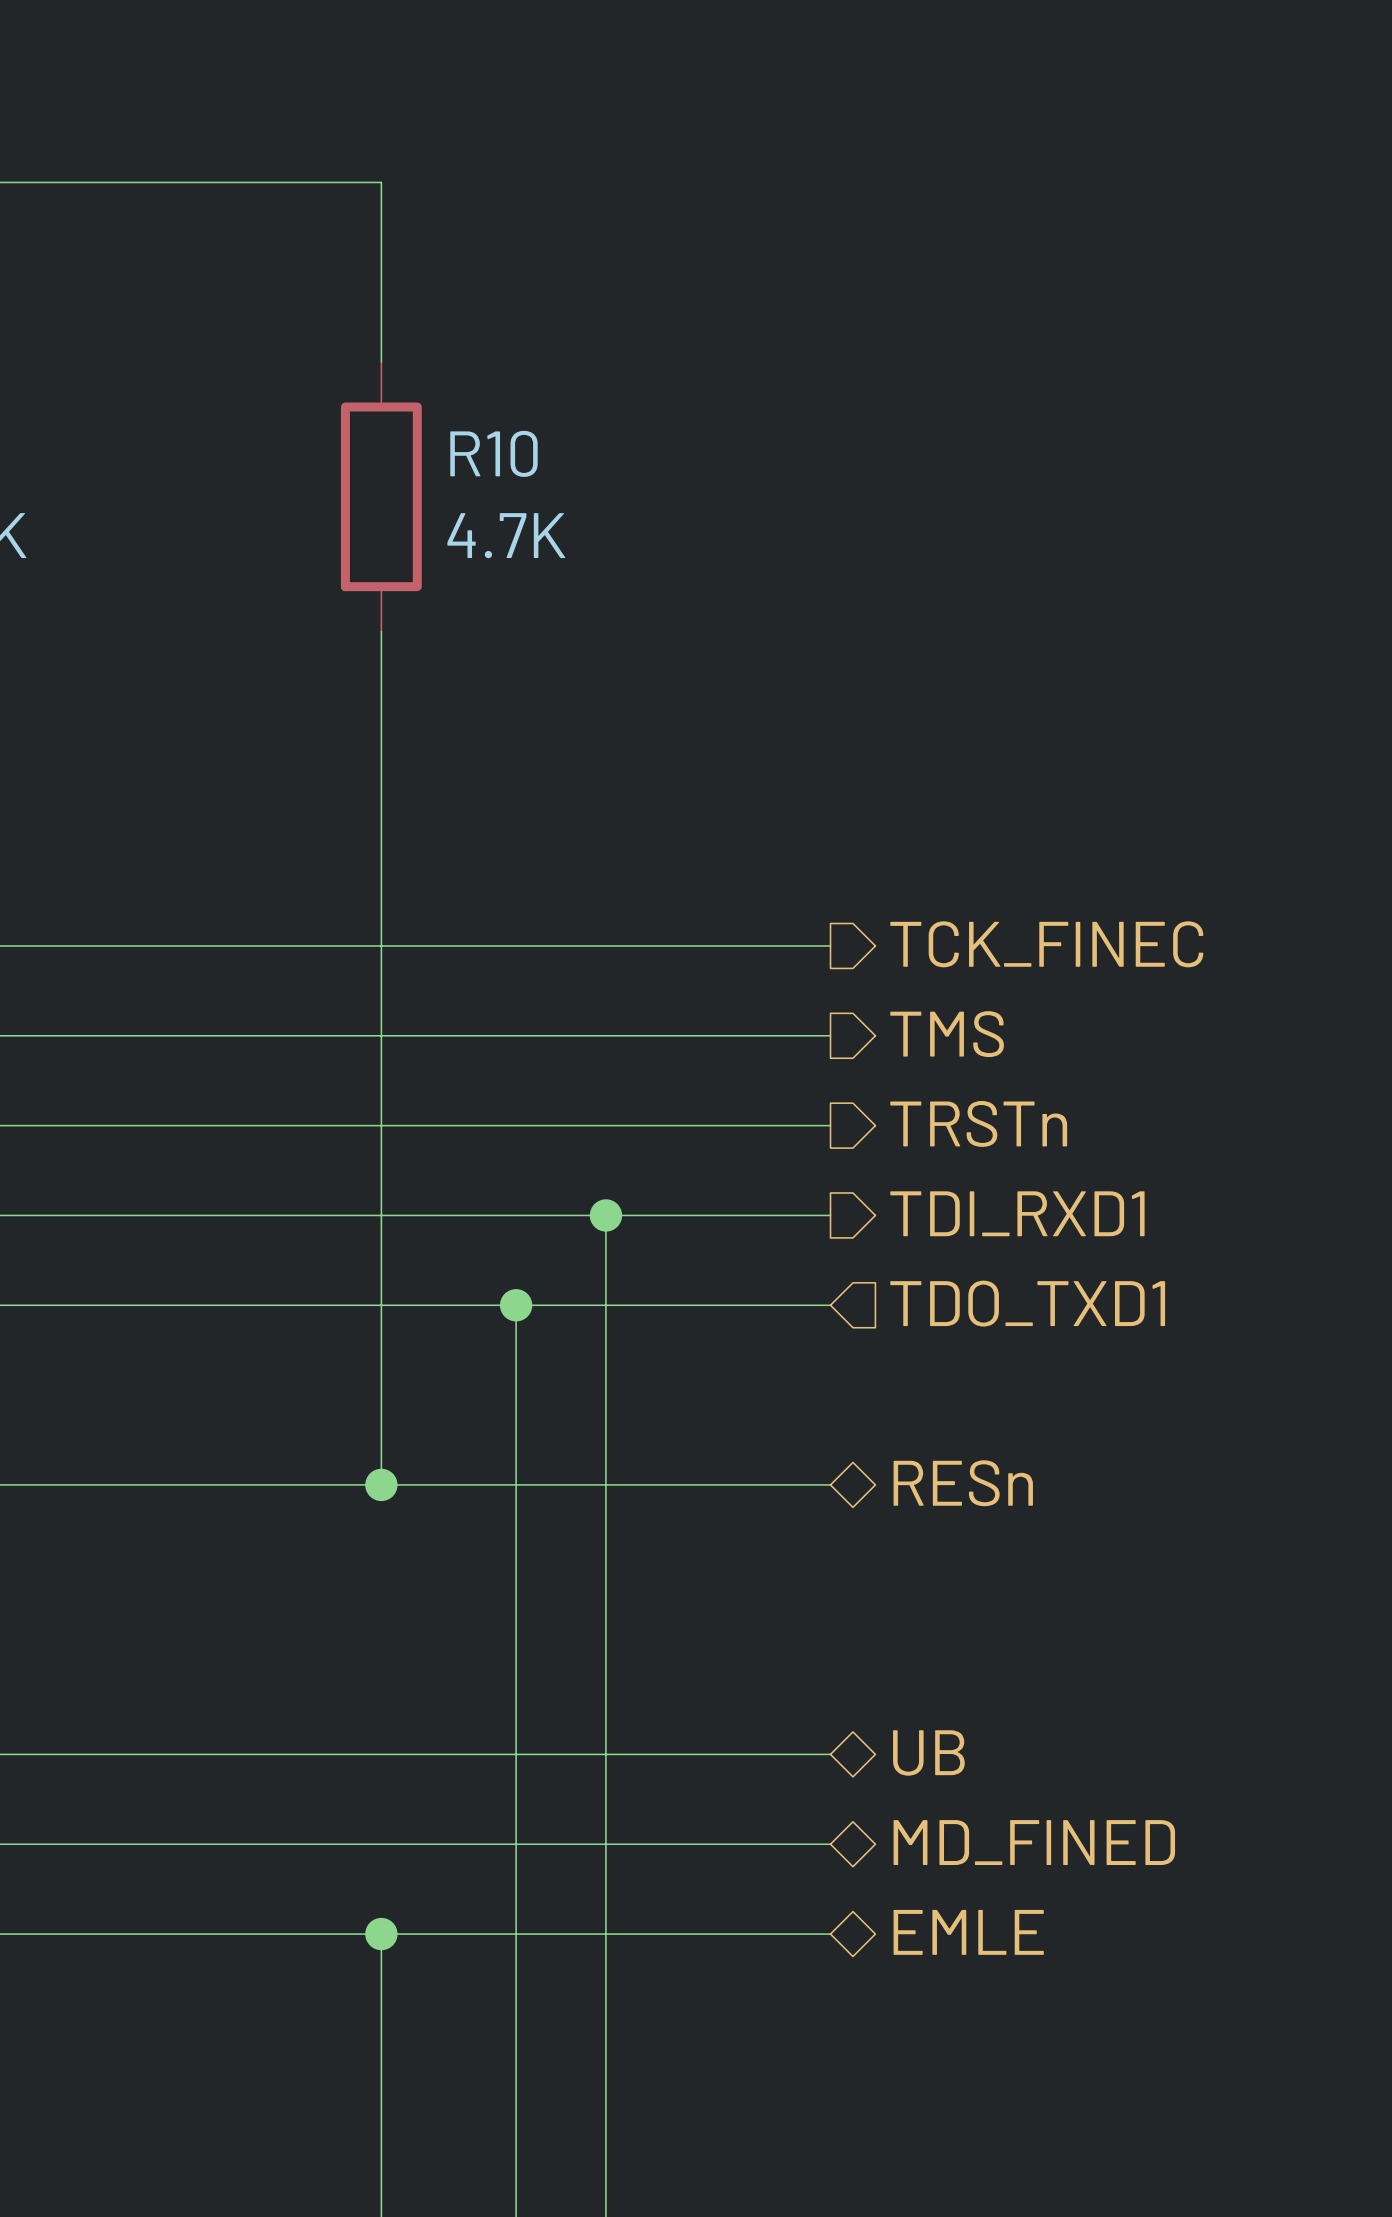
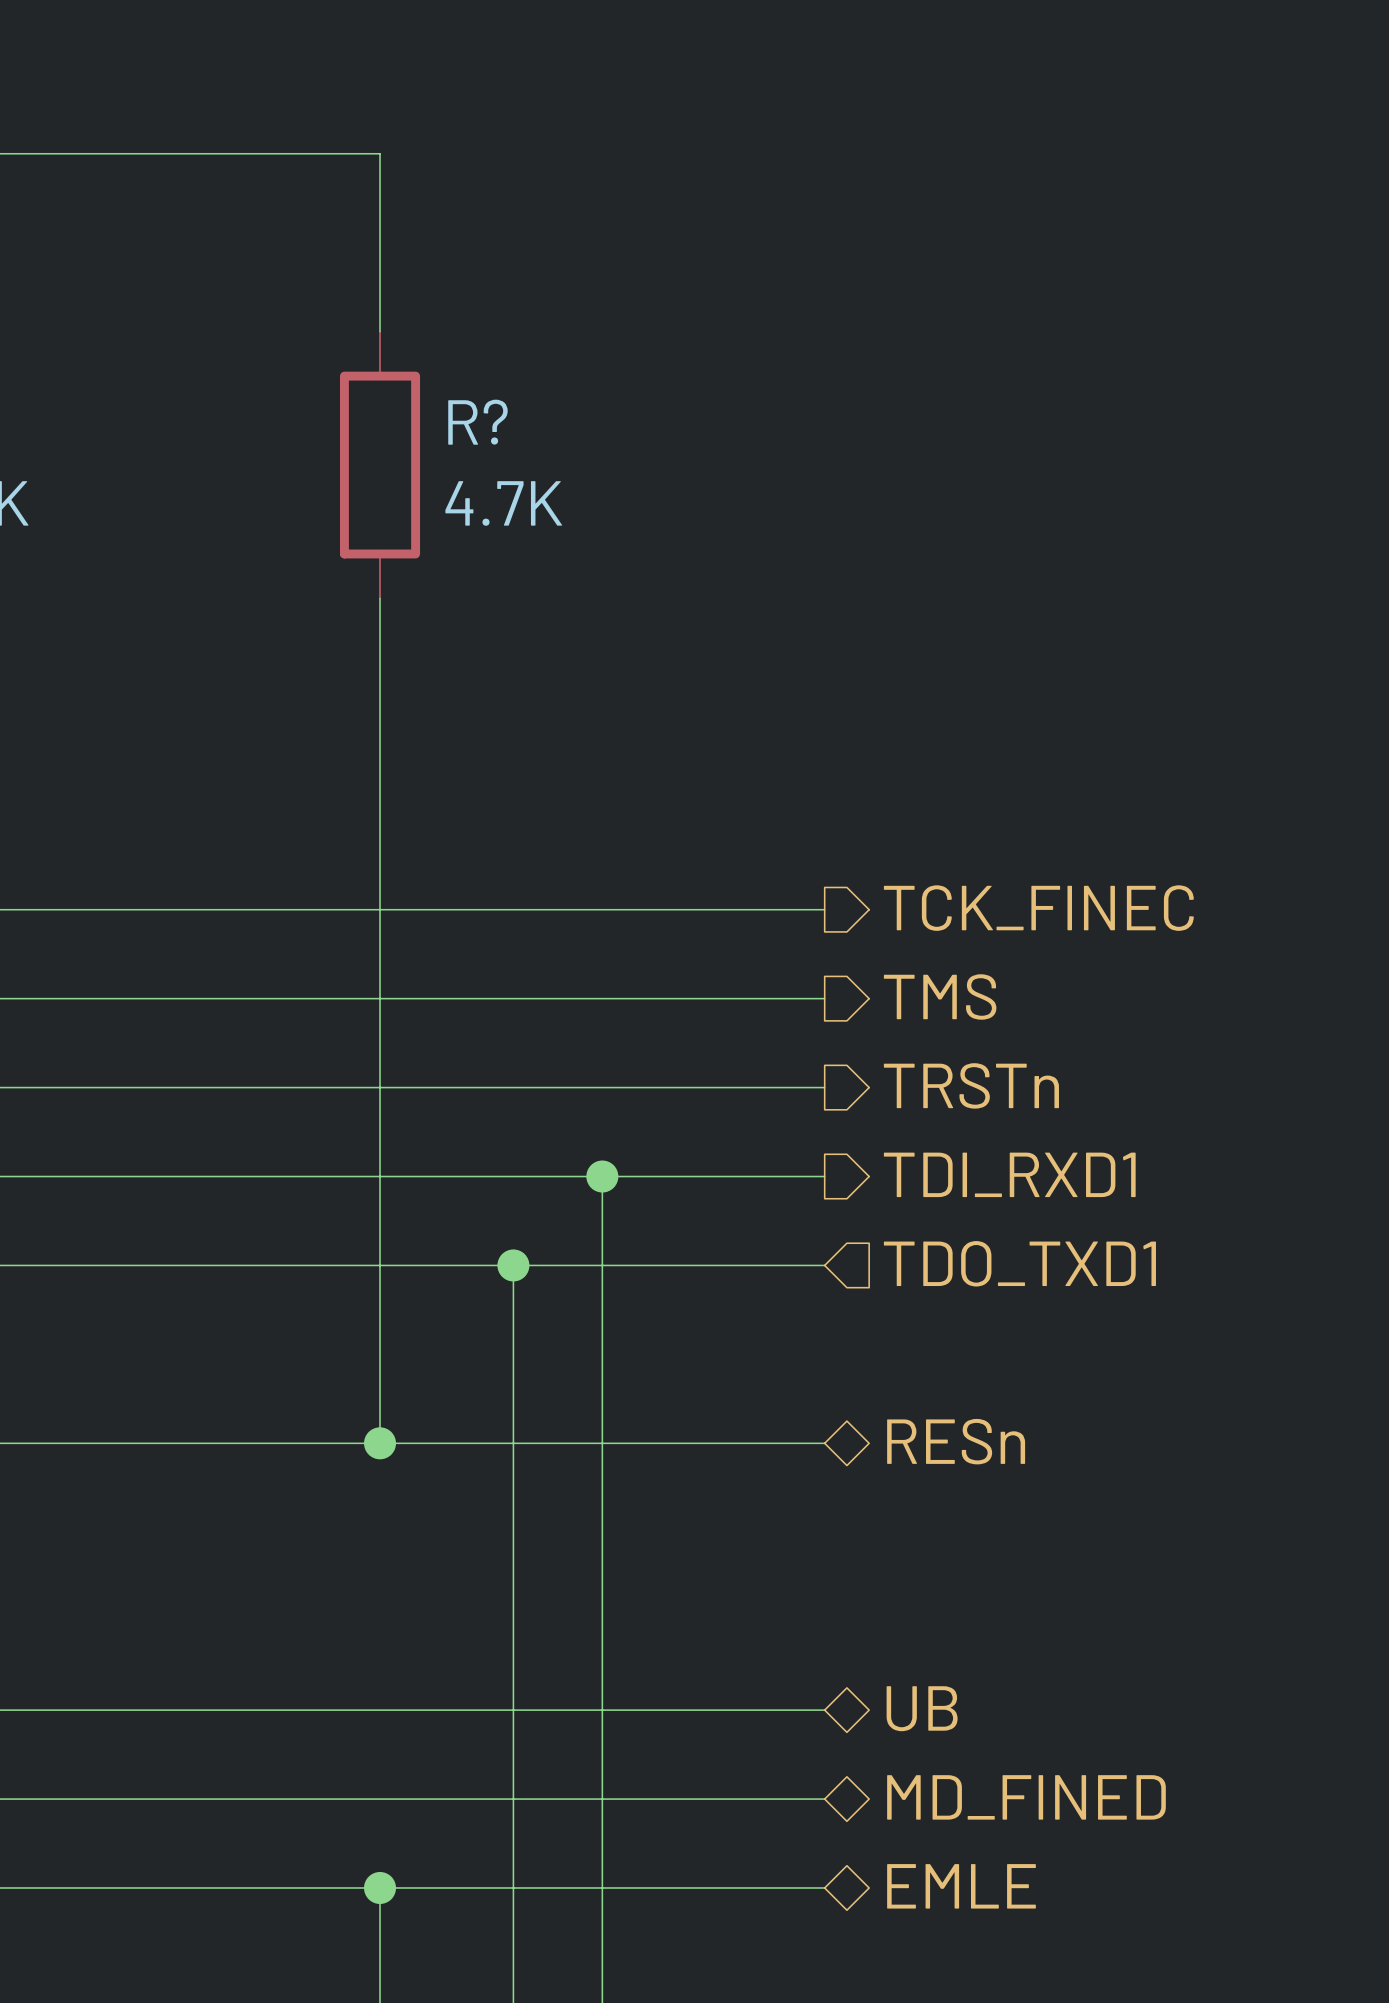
R10 name: R10 (493, 453) -> R? (477, 422)

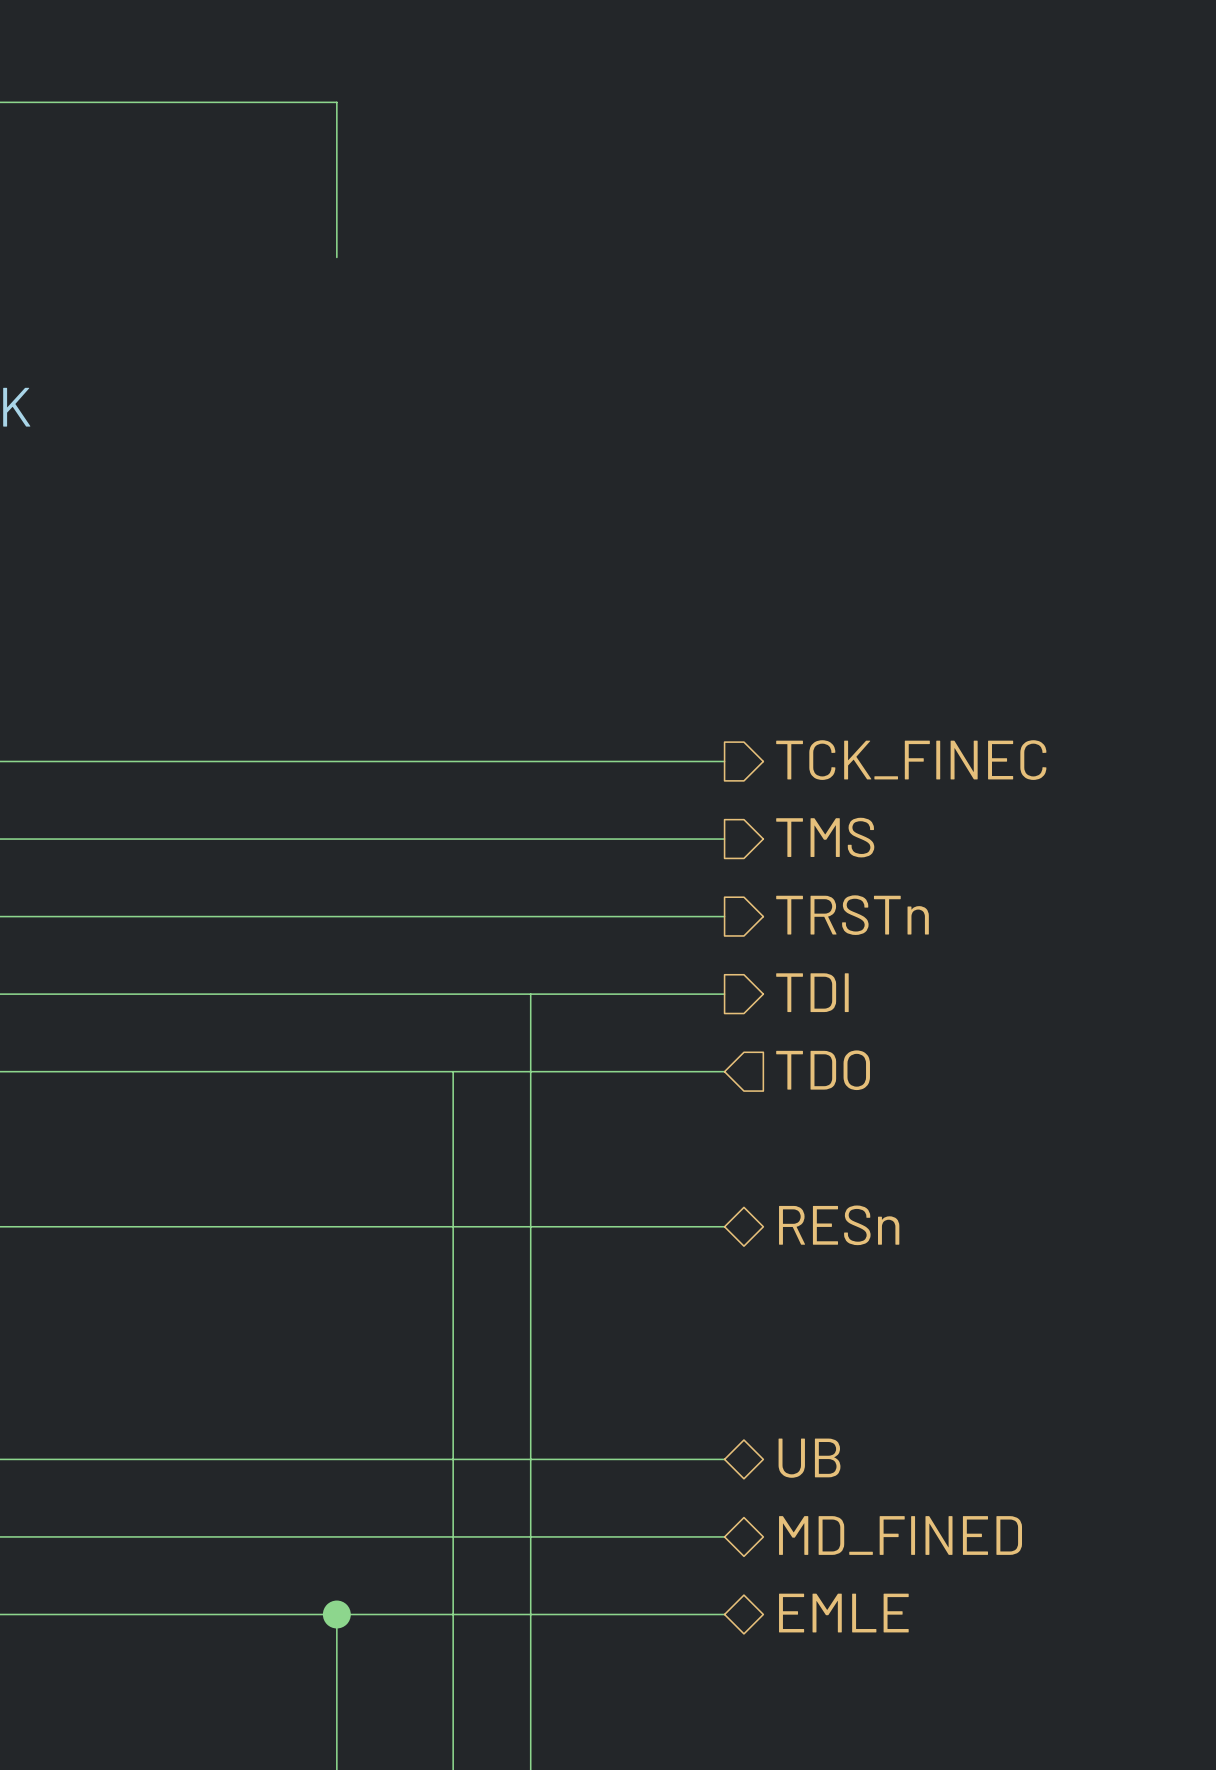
R?: 4.7K (380, 465) -> none
wire: (380, 598) (380, 1443) -> none
hierarchical label: TDI_RXD1 (1009, 1174) -> TDI (812, 992)
junction: (602, 1176) -> none
hierarchical label: TDO_TXD1 (1019, 1263) -> TDO (823, 1070)
junction: (513, 1265) -> none
junction: (380, 1443) -> none

